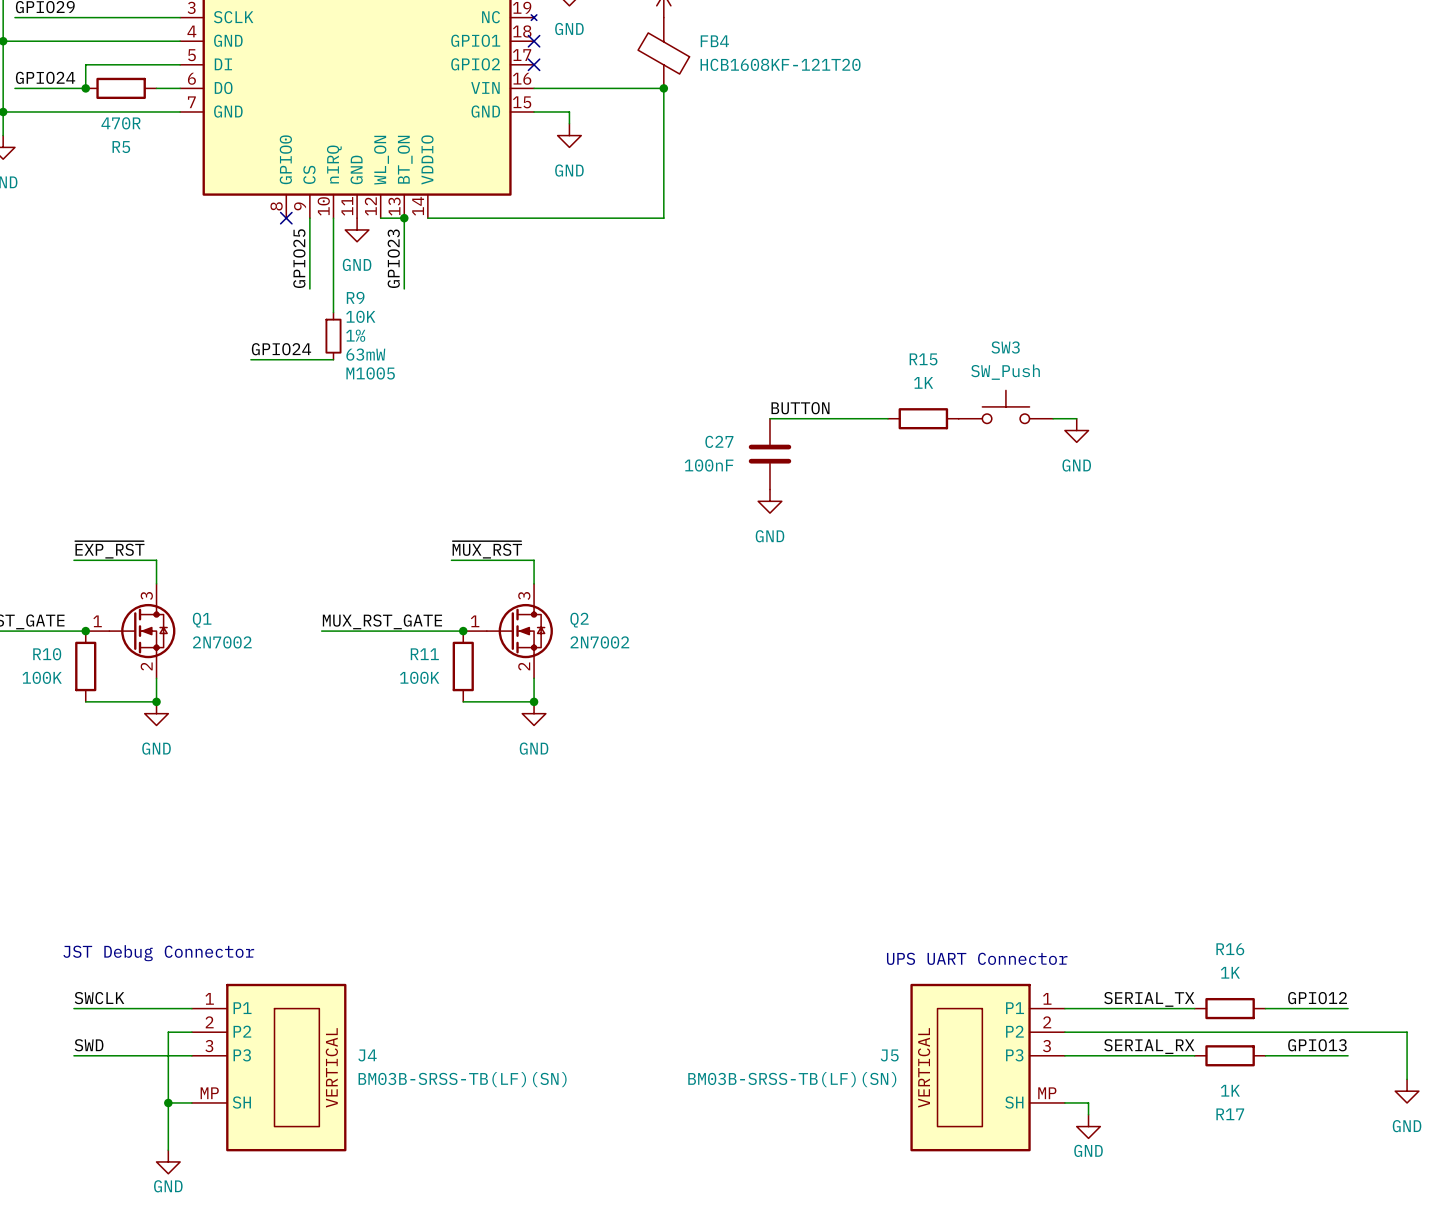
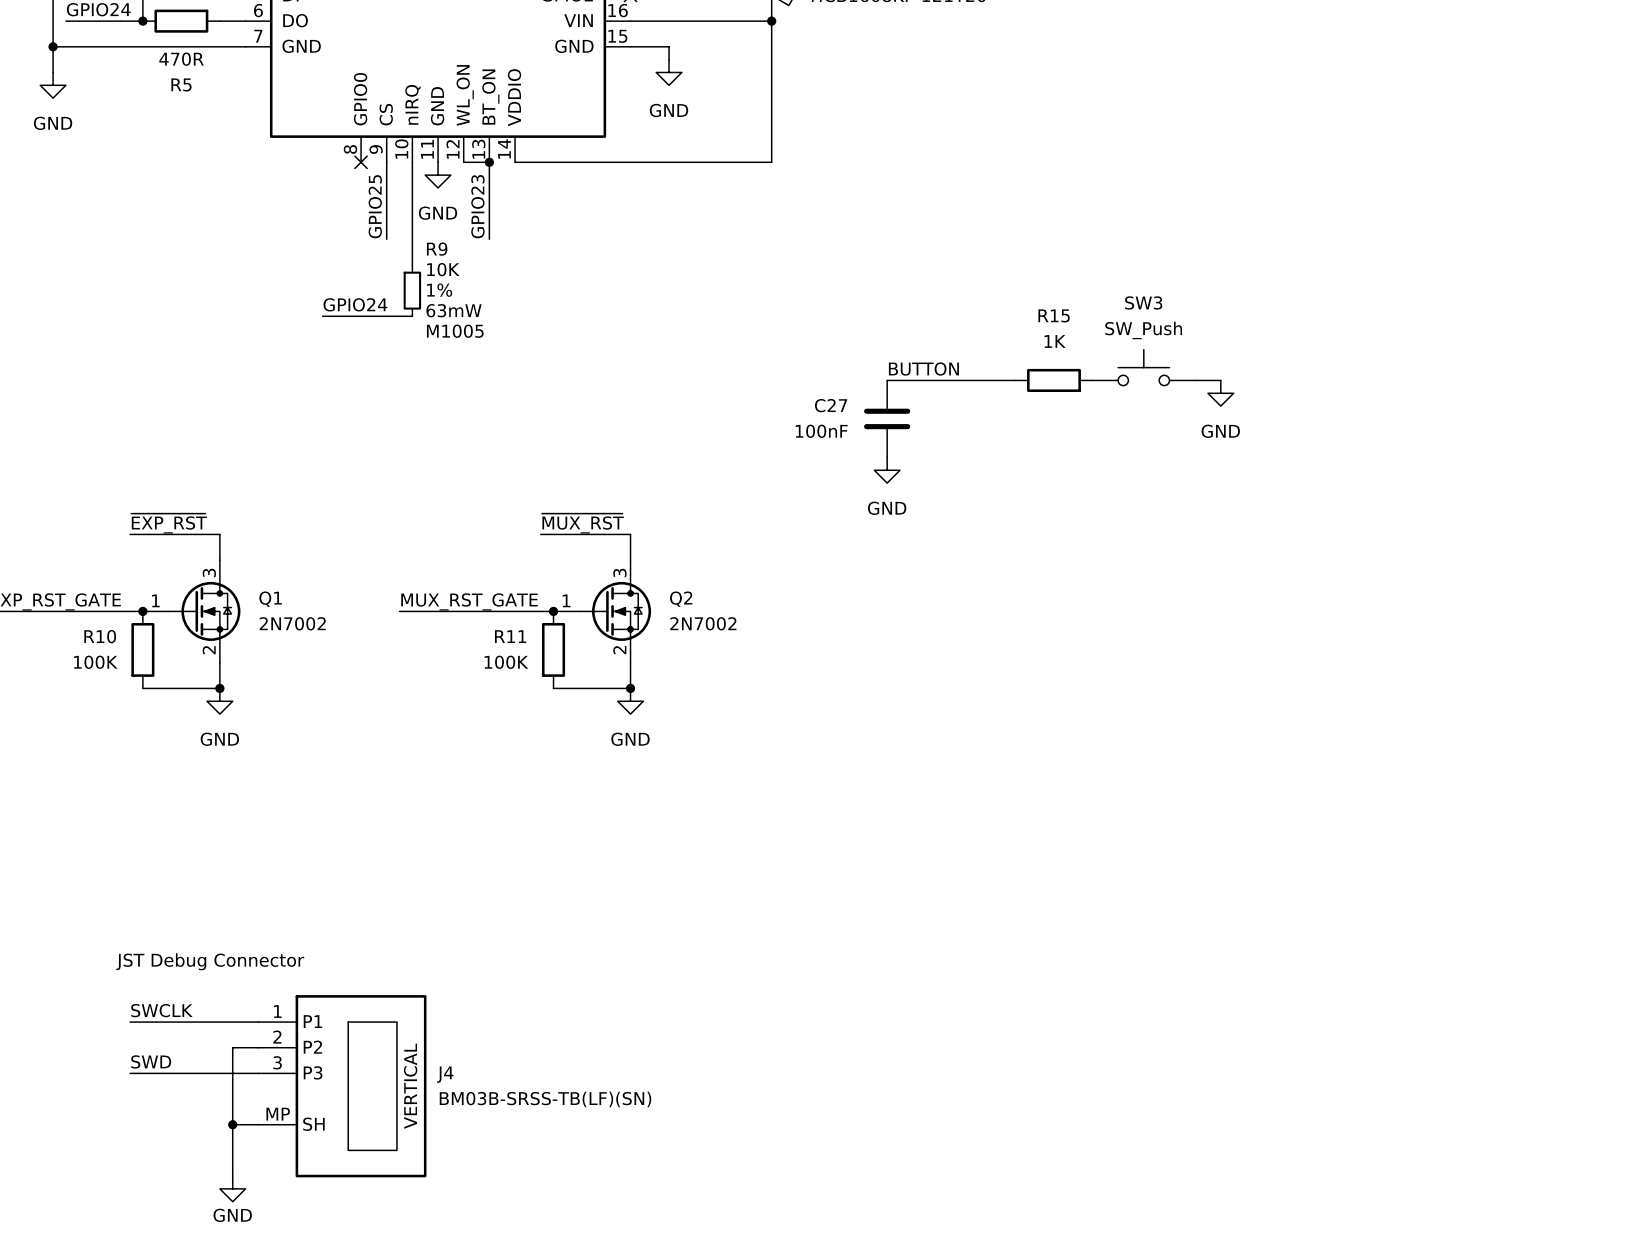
text: UPS UART Connector (977, 958) -> none
label: GPIO12 (1317, 998) -> none
label: SERIAL_TX (1149, 999) -> none
wire: (1064, 1008) (1194, 1008) -> none
R16: 1K (1230, 1008) -> none
wire: (1265, 1008) (1348, 1008) -> none
wire: (1064, 1032) (1407, 1032) (1407, 1079) -> none
label: GPIO13 (1317, 1045) -> none
label: SERIAL_RX (1149, 1046) -> none
wire: (1064, 1055) (1194, 1055) -> none
R17: 1K (1230, 1055) -> none
wire: (1265, 1055) (1348, 1055) -> none
J5: BM03B-SRSS-TB(LF)(SN) (987, 1067) -> none
power symbol: GND (1407, 1091) -> none
wire: (1064, 1102) (1088, 1102) (1088, 1114) -> none
power symbol: GND (1088, 1126) -> none

